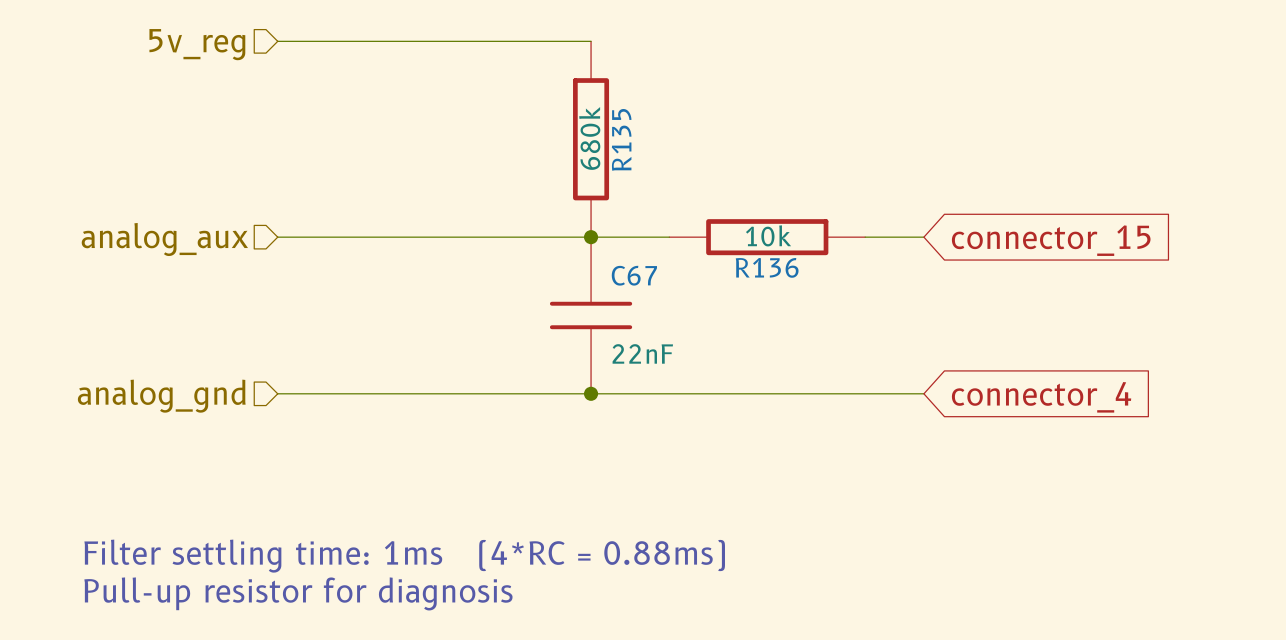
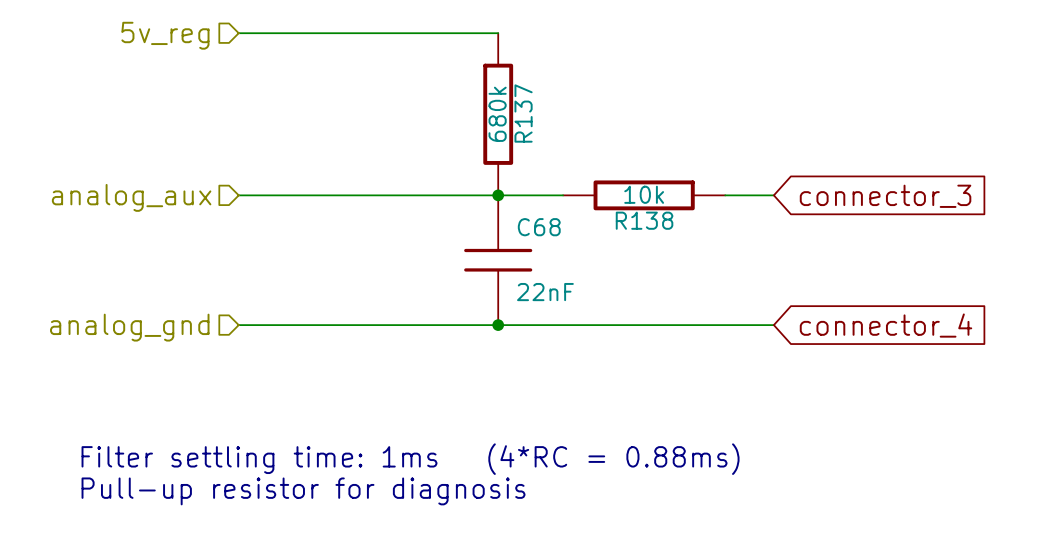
R135 name: R135 (621, 139) -> R137 (523, 113)
global label: connector_15 (1051, 240) -> connector_3 (885, 196)
R136 name: R136 (767, 267) -> R138 (644, 220)
C67 name: C67 (634, 275) -> C68 (539, 227)

